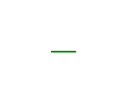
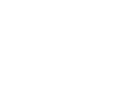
wire: (51, 51) (75, 51) -> none

